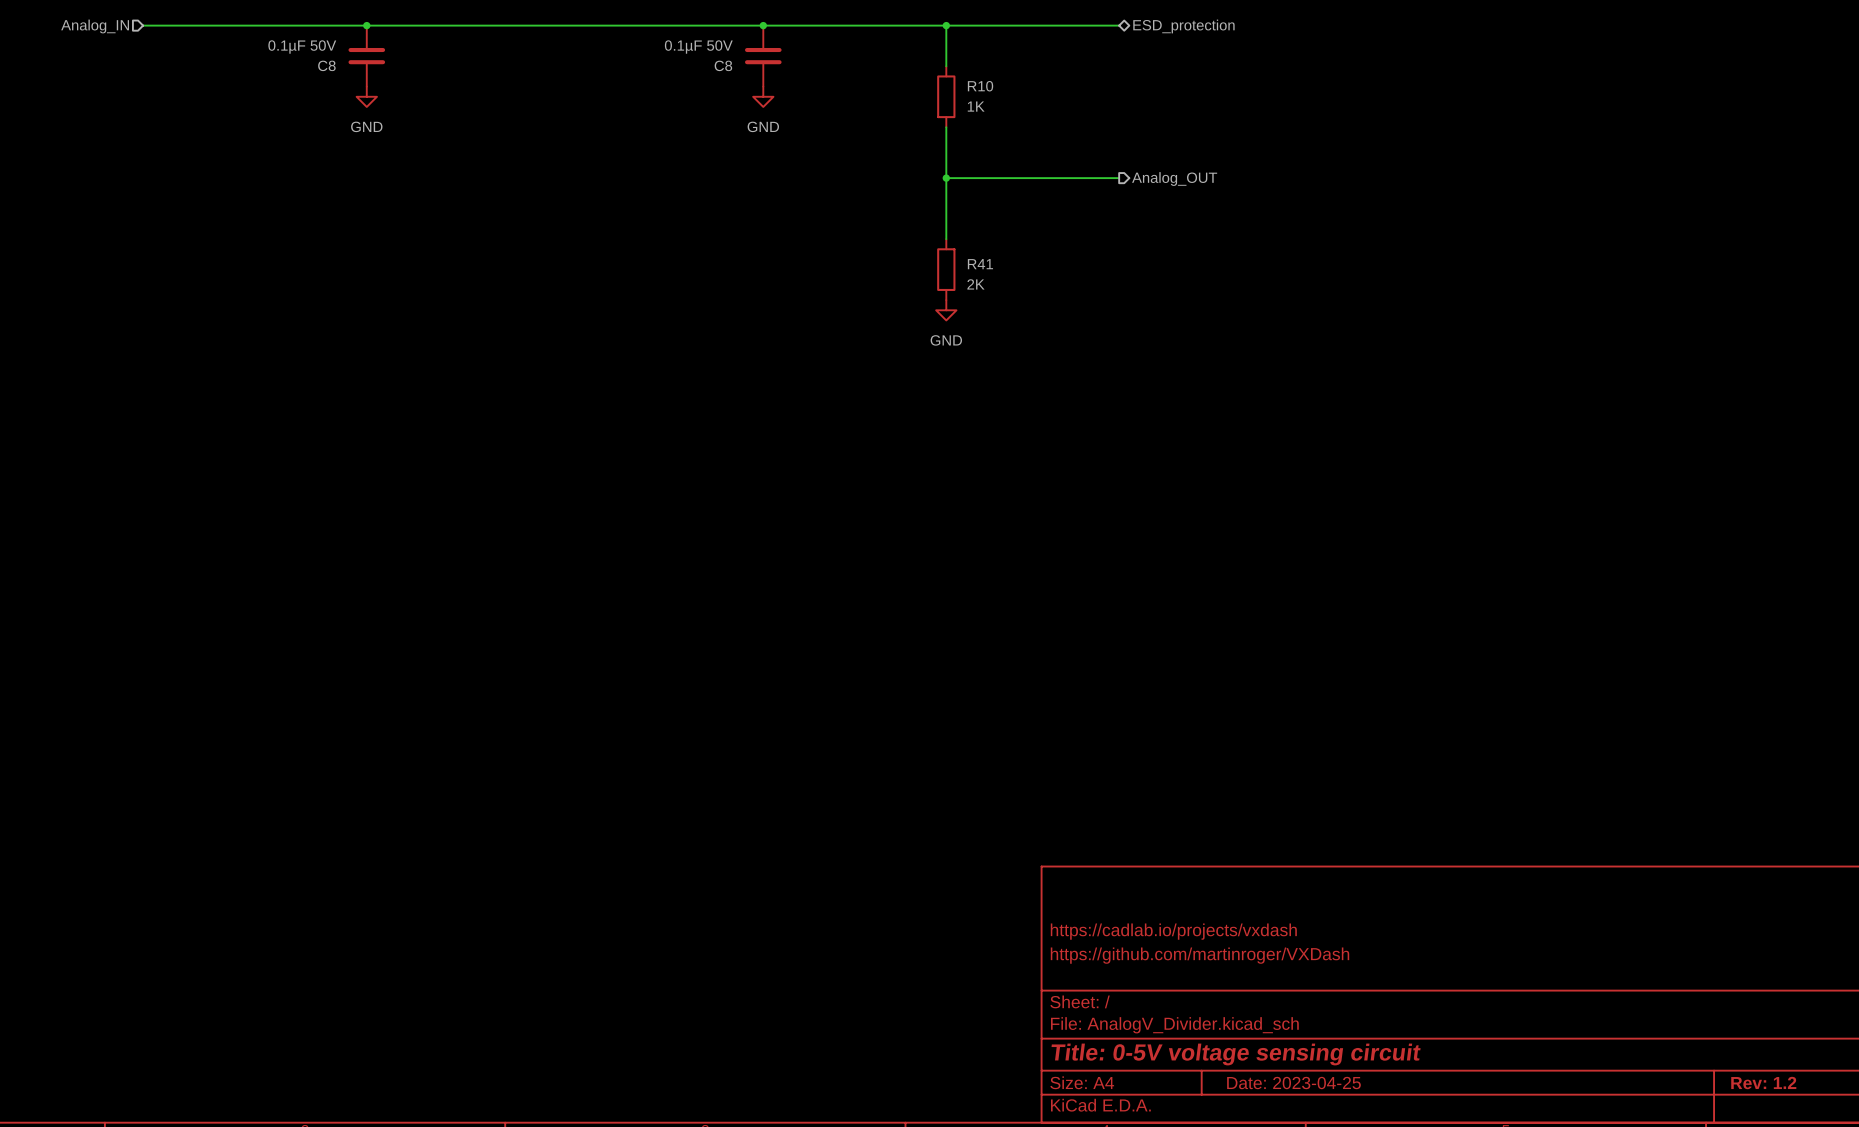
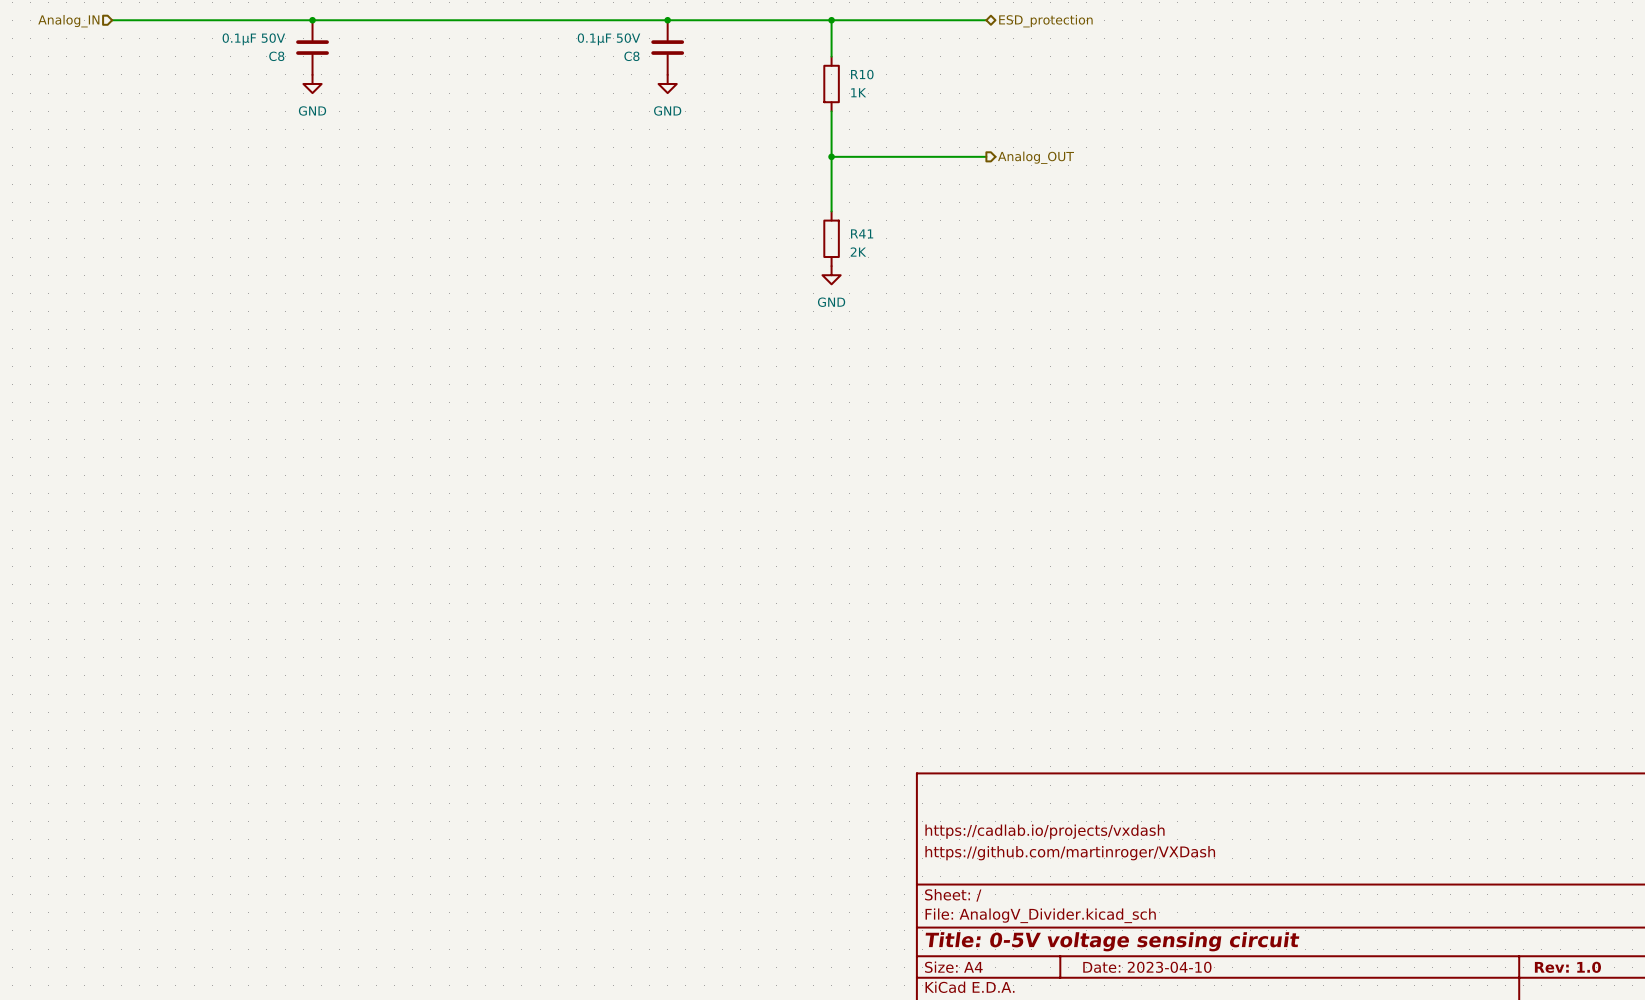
title block: Date: 2023-04-25 (1293, 1083) -> Date: 2023-04-10 (1147, 967)
title block: Rev: 1.2 (1763, 1083) -> Rev: 1.0 (1567, 967)

